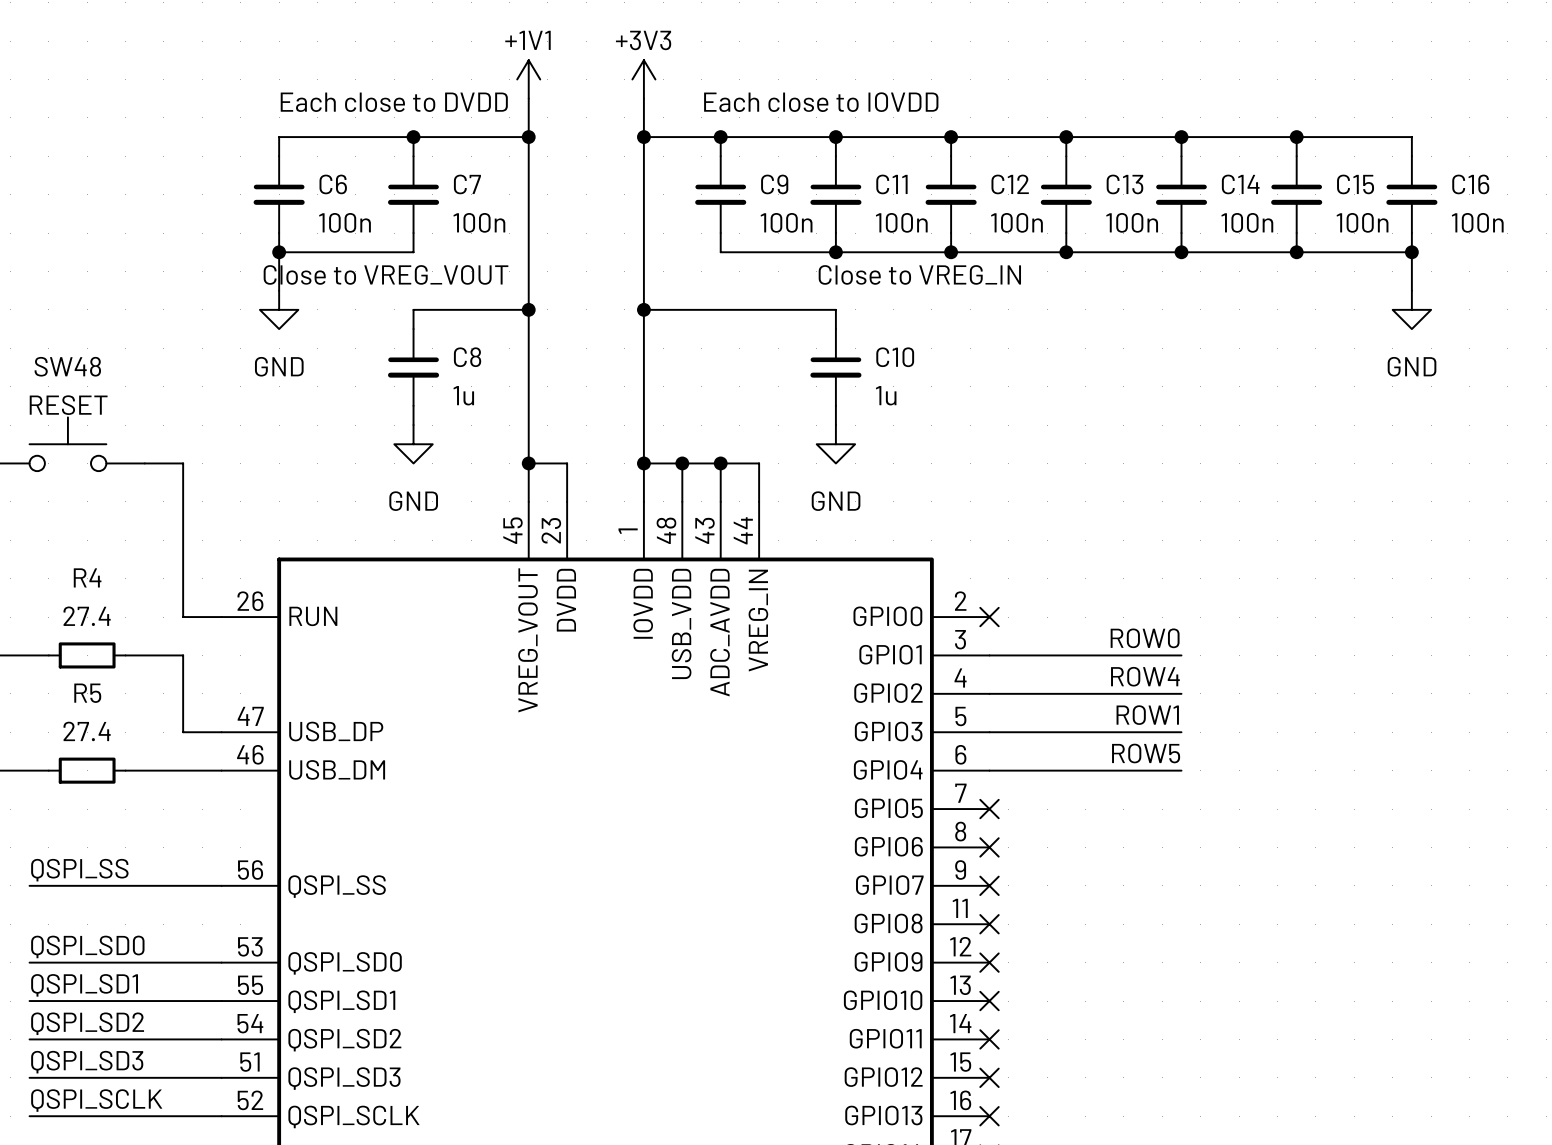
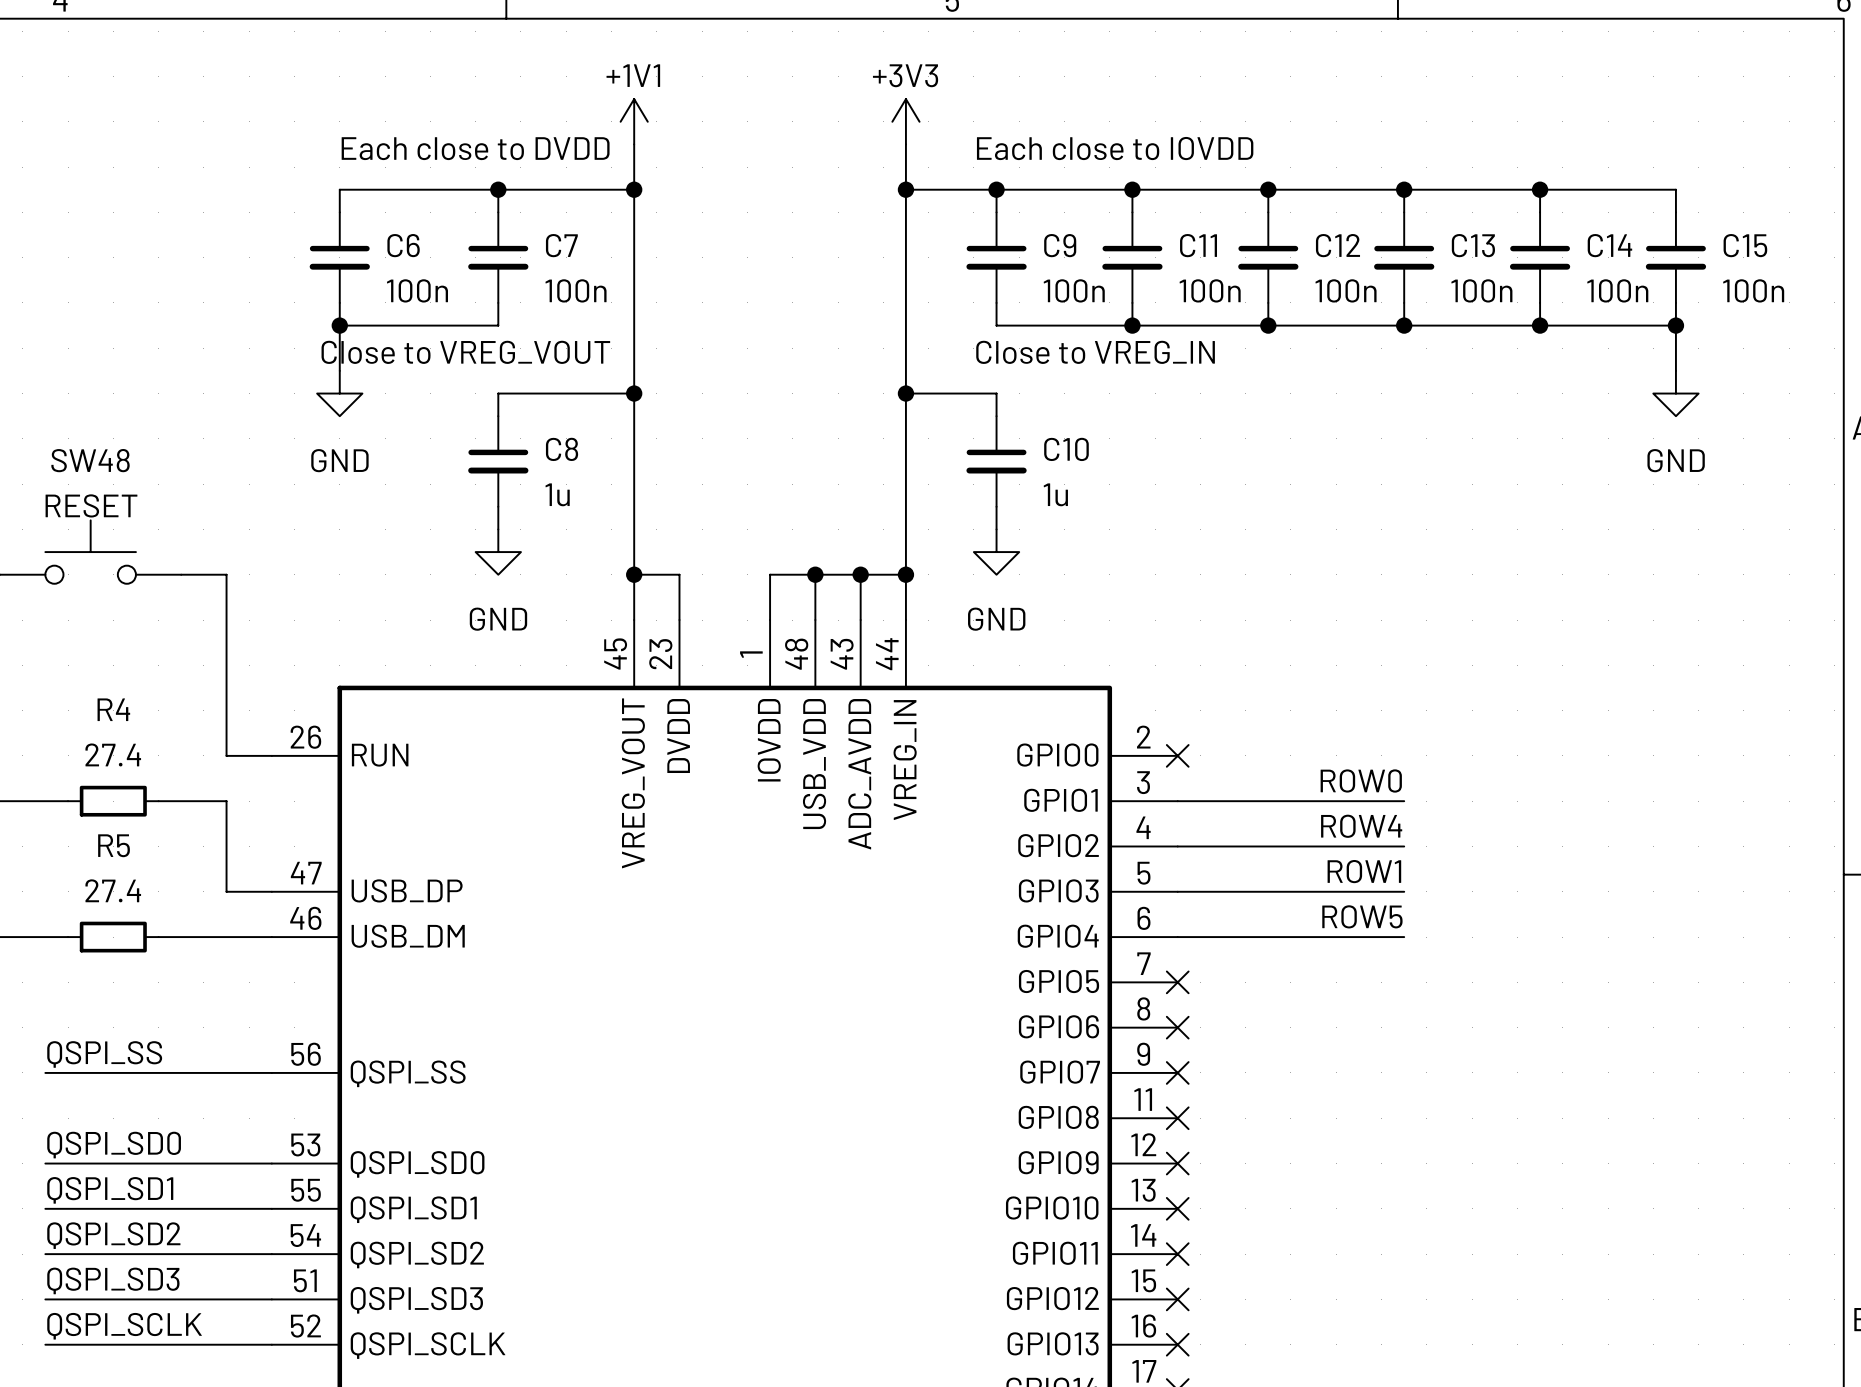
power symbol position: +3V3 (643, 79) -> +3V3 (905, 121)
wire: (643, 98) (643, 463) -> (905, 144) (905, 574)
text position: Each close to IOVDD (821, 102) -> Each close to IOVDD (1115, 148)
wire: (643, 137) (759, 137) -> none
junction: (643, 137) -> none
wire: (720, 137) (720, 156) -> none
junction position: (720, 137) -> (905, 189)
C11 name: C11 (891, 184) -> C9 (1060, 245)
C12 name: C12 (1010, 184) -> C11 (1198, 245)
C13 name: C13 (1124, 184) -> C12 (1337, 245)
C14 name: C14 (1240, 184) -> C13 (1473, 245)
C15 name: C15 (1355, 184) -> C14 (1609, 245)
C16 name: C16 (1470, 184) -> C15 (1745, 245)
C9: 100n (720, 194) -> none
wire: (720, 233) (720, 252) (835, 252) -> none
junction: (835, 252) -> none
wire: (643, 309) (759, 309) -> none
junction: (643, 309) -> none
junction: none -> (905, 393)
junction: (643, 463) -> none
junction: none -> (905, 574)

